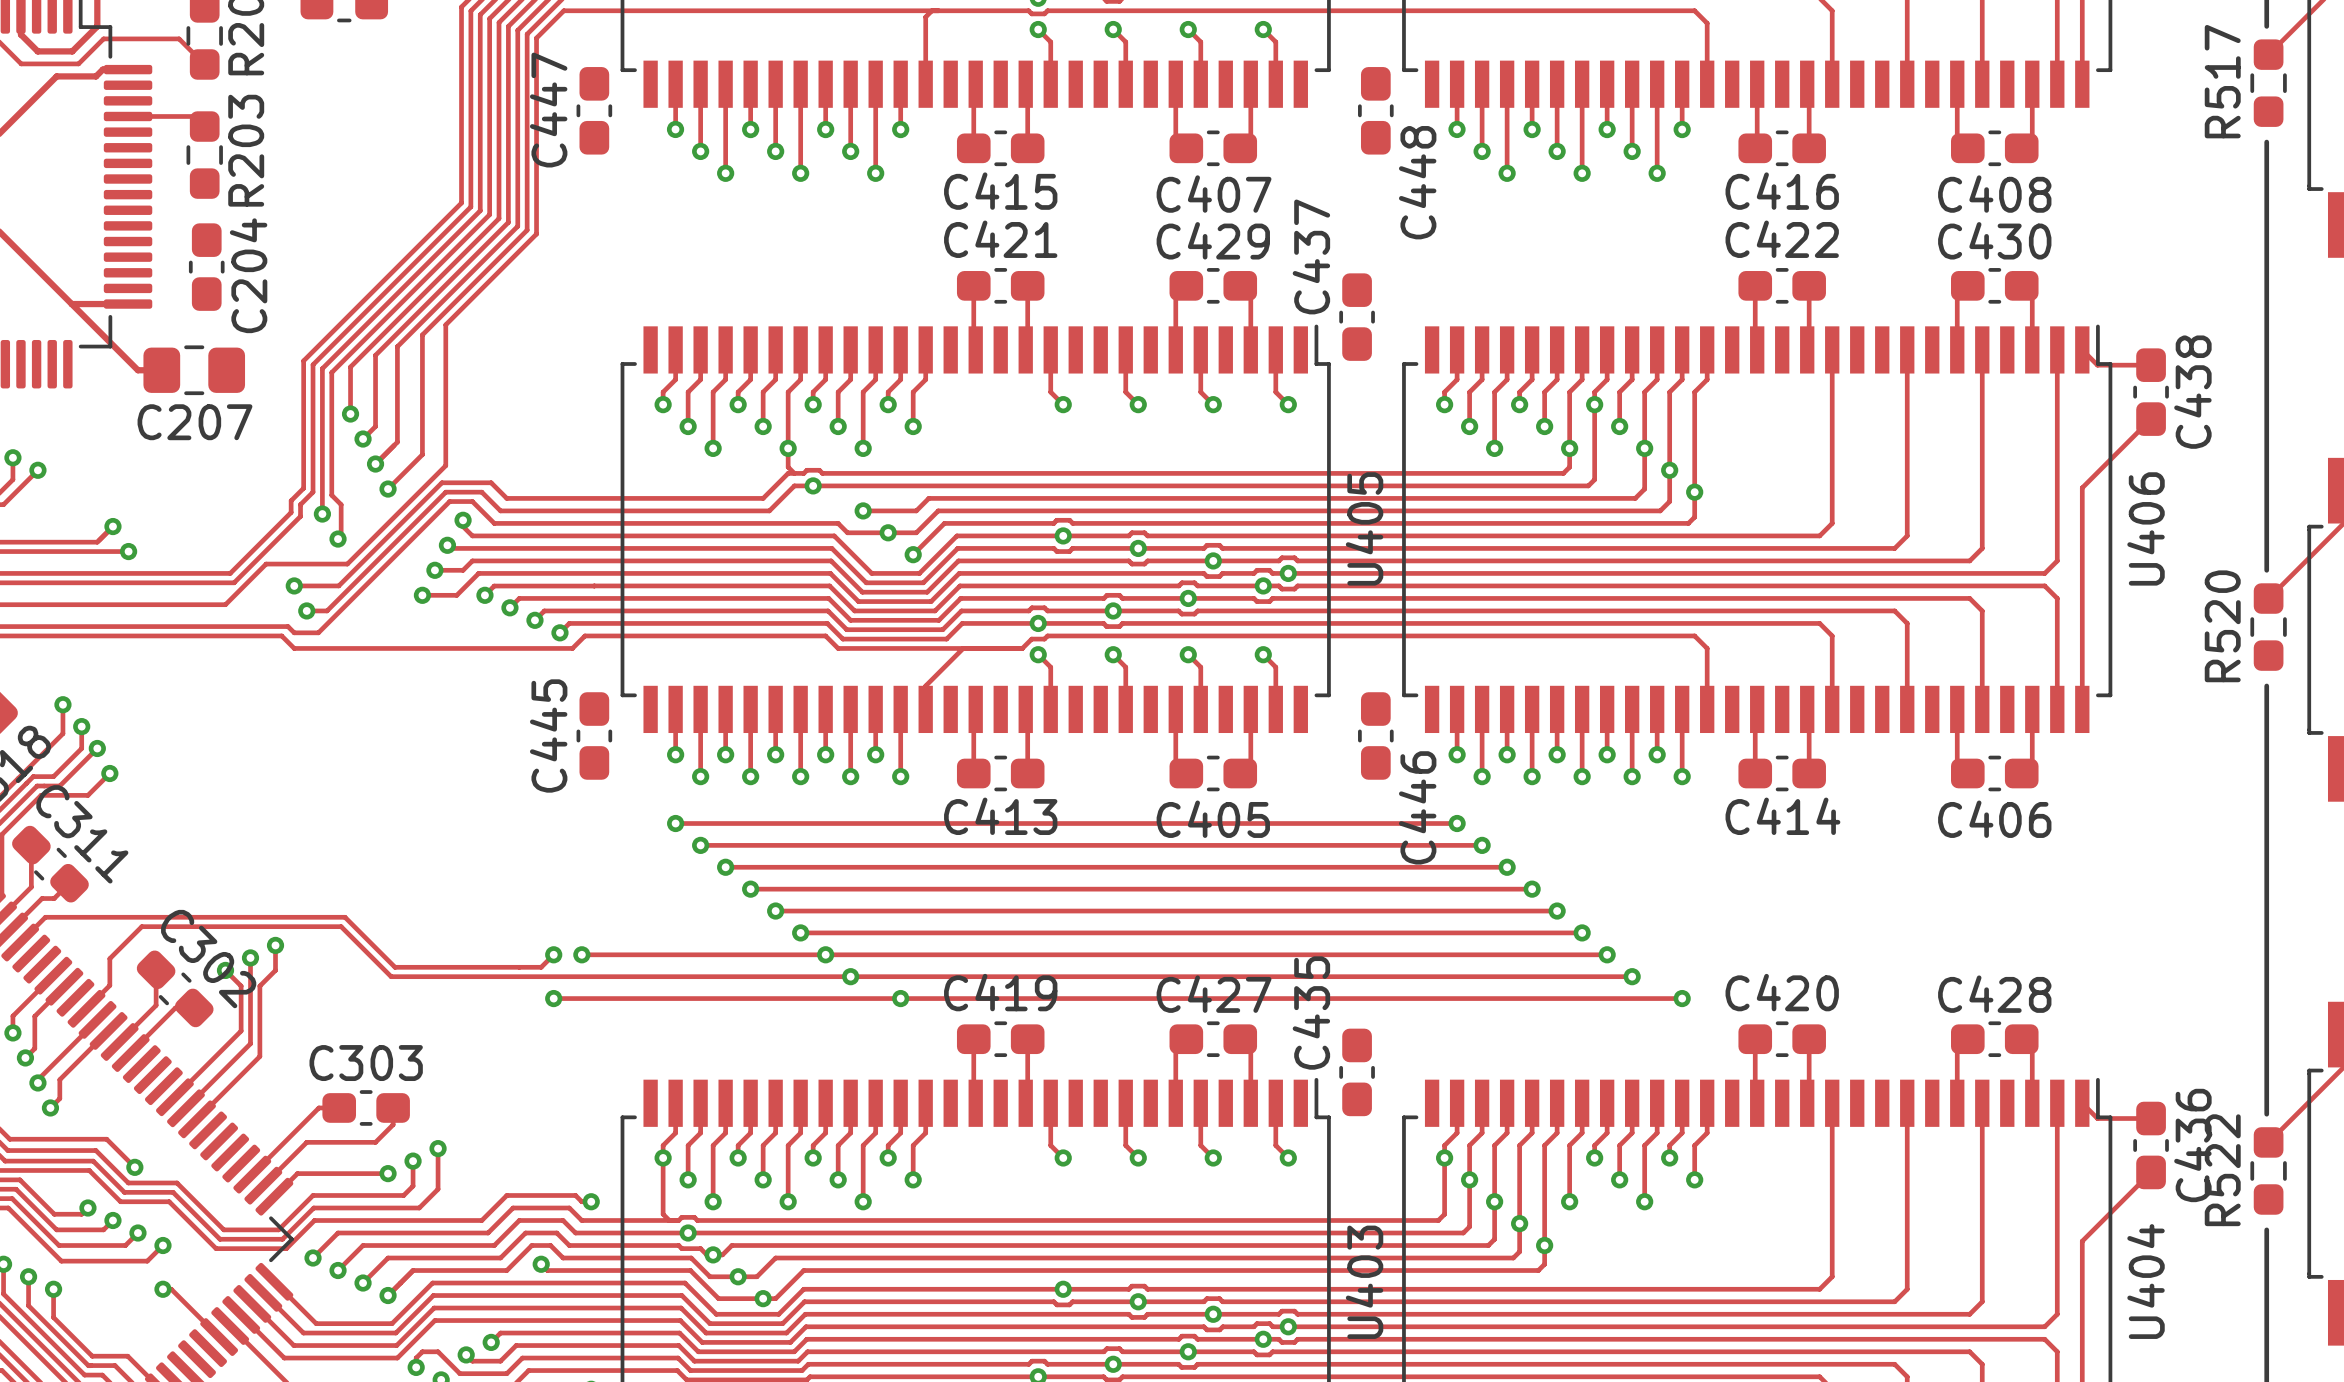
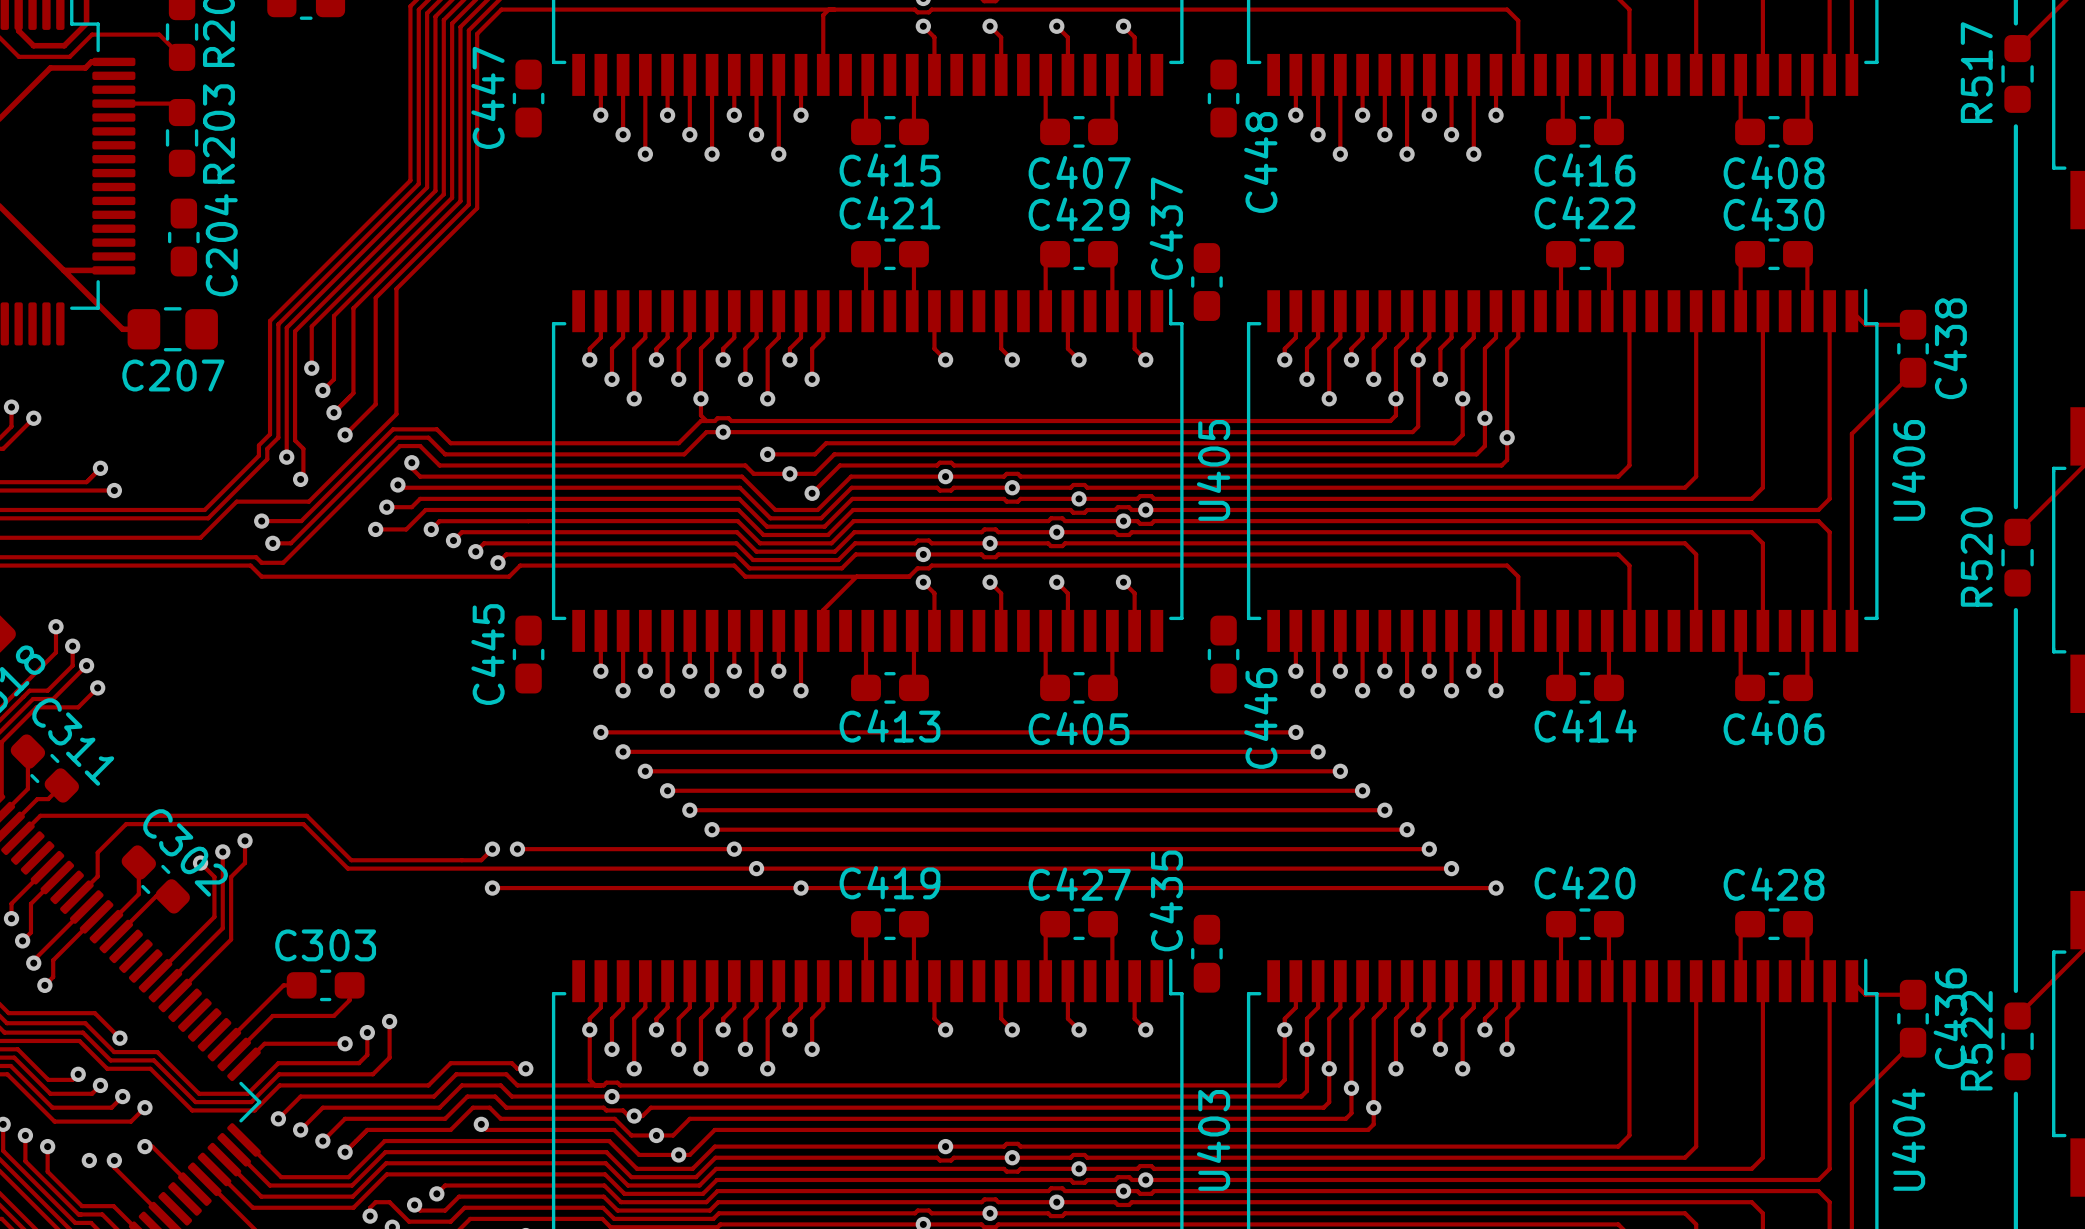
via: none -> (89, 1160)
track: none -> (114, 1160) (114, 1167) (165, 1218)
via: none -> (114, 1160)

